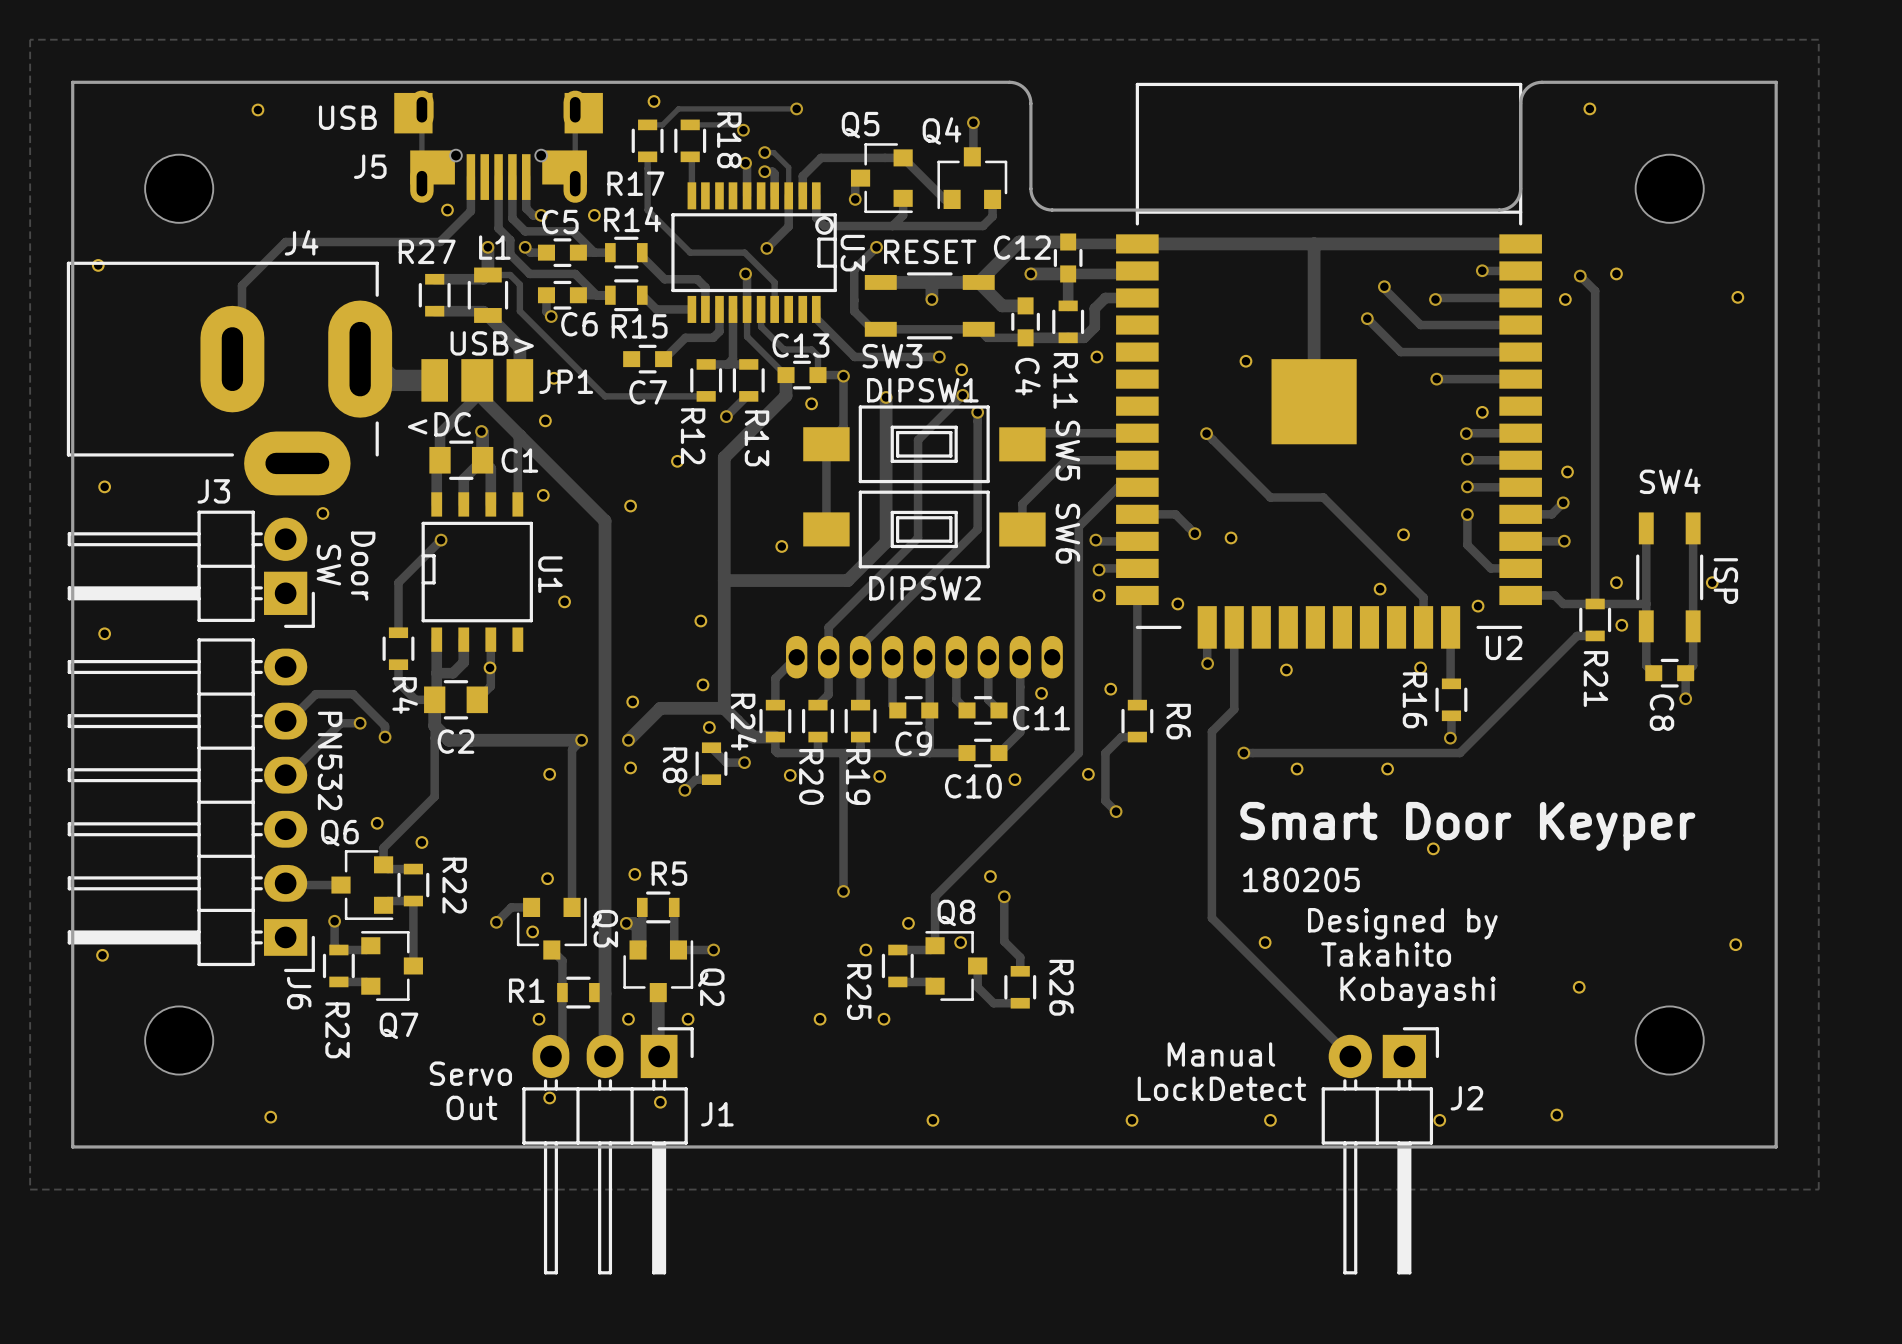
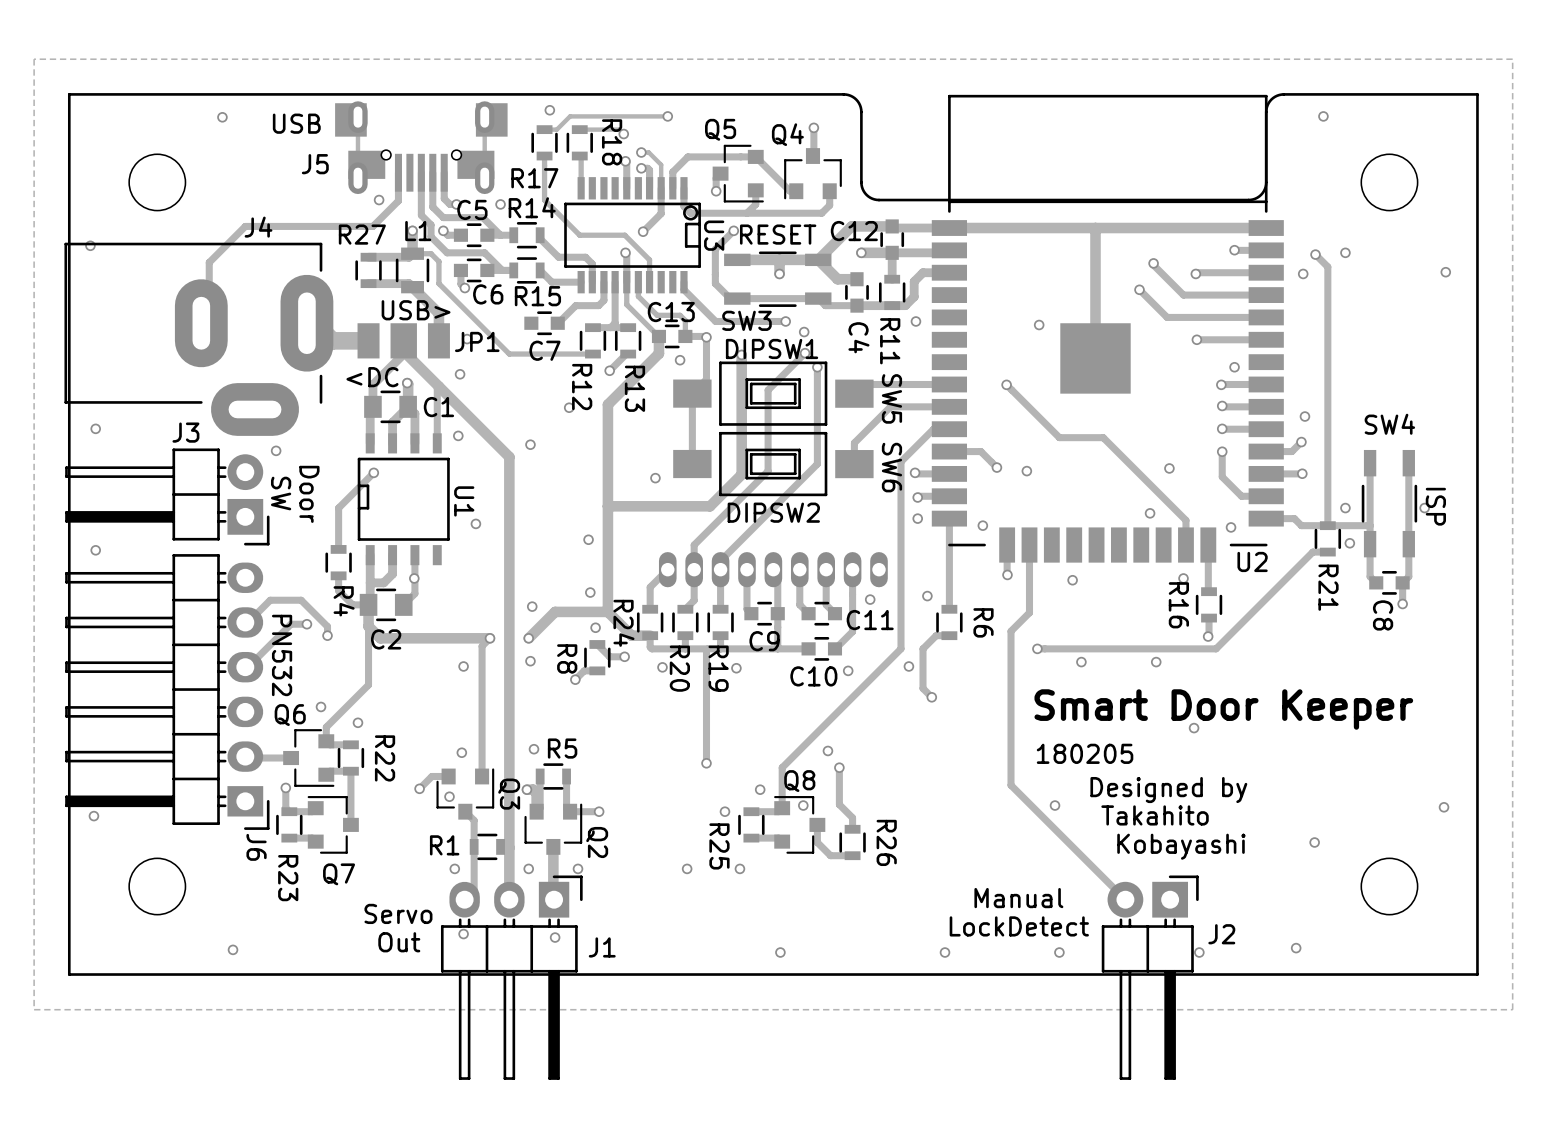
text: Smart Door Keyper (1467, 826) -> Smart Door Keeper (1223, 709)

